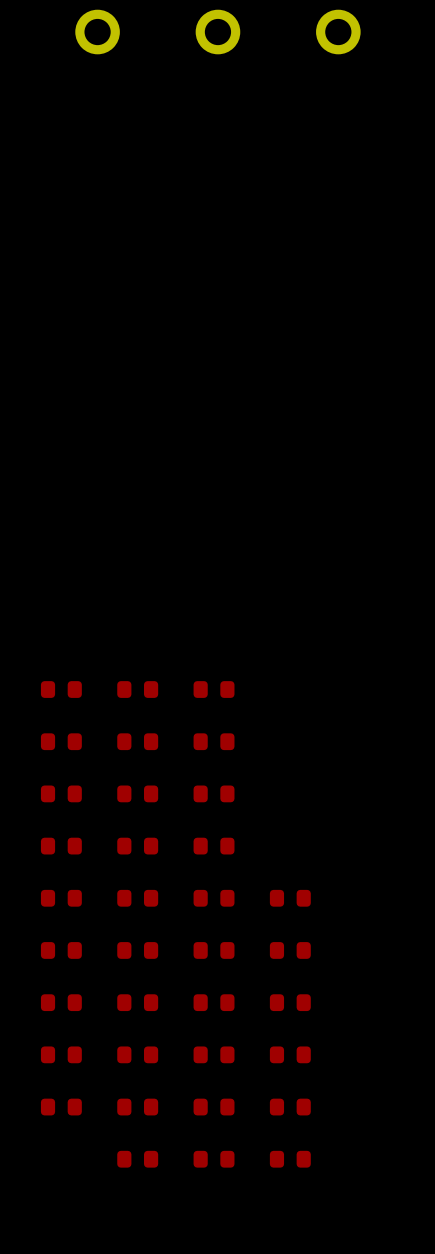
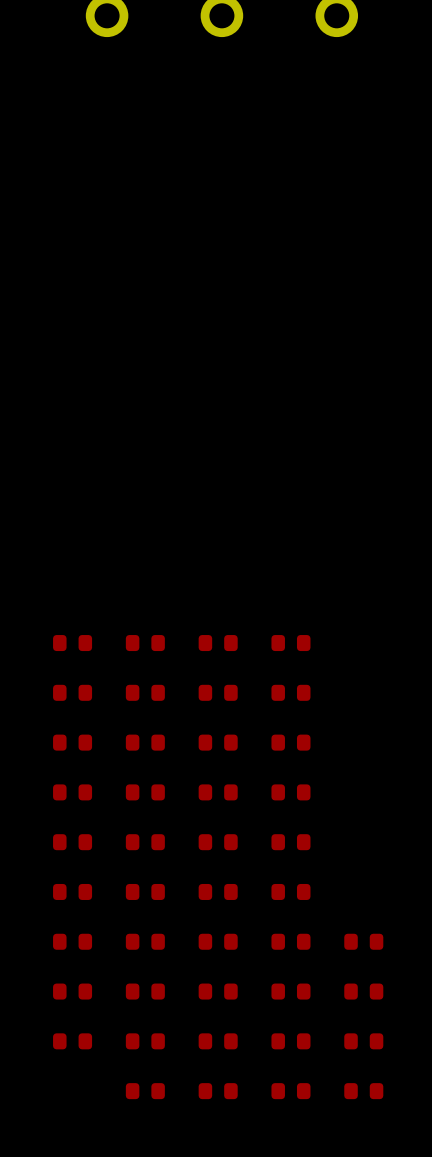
part: none -> (290, 643)
part: none -> (290, 692)
part: none -> (290, 742)
part: none -> (290, 792)
part: none -> (363, 941)
part: none -> (363, 991)
part: none -> (363, 1041)
part: none -> (363, 1091)

